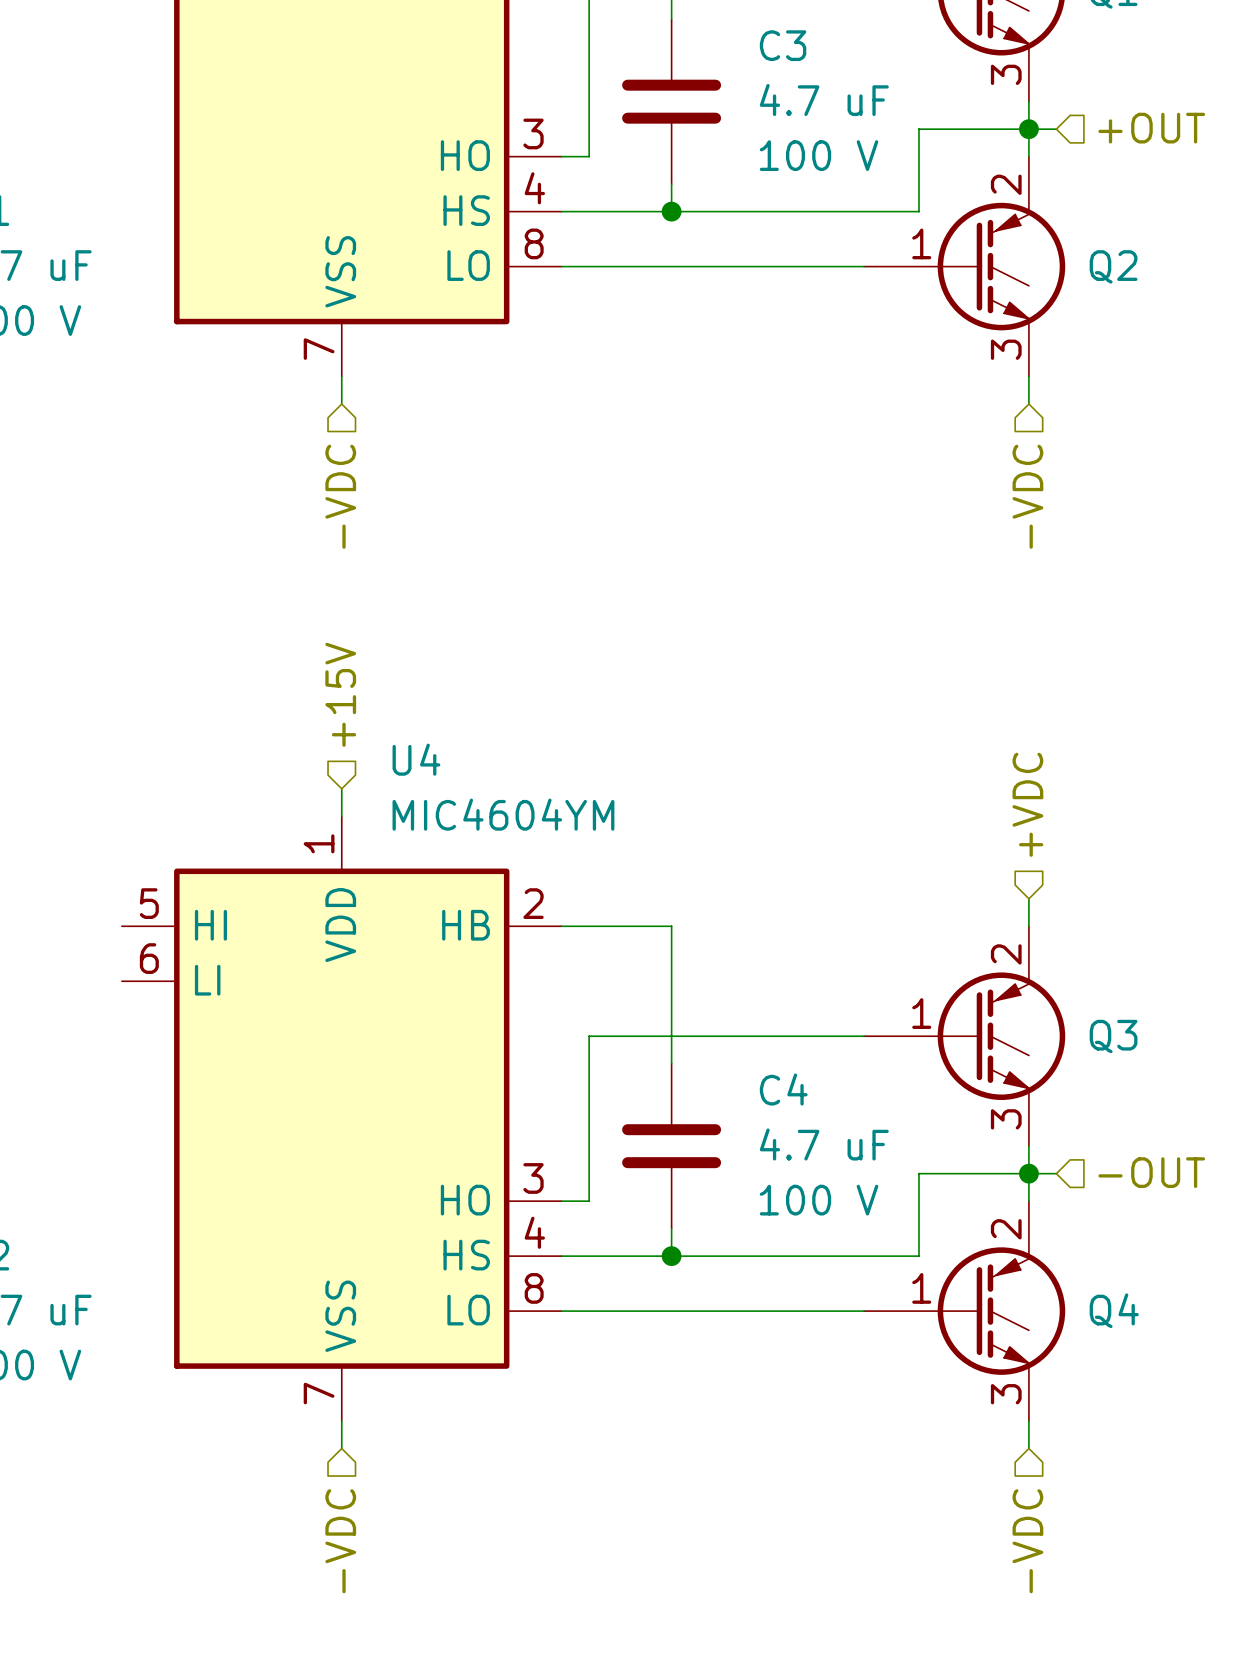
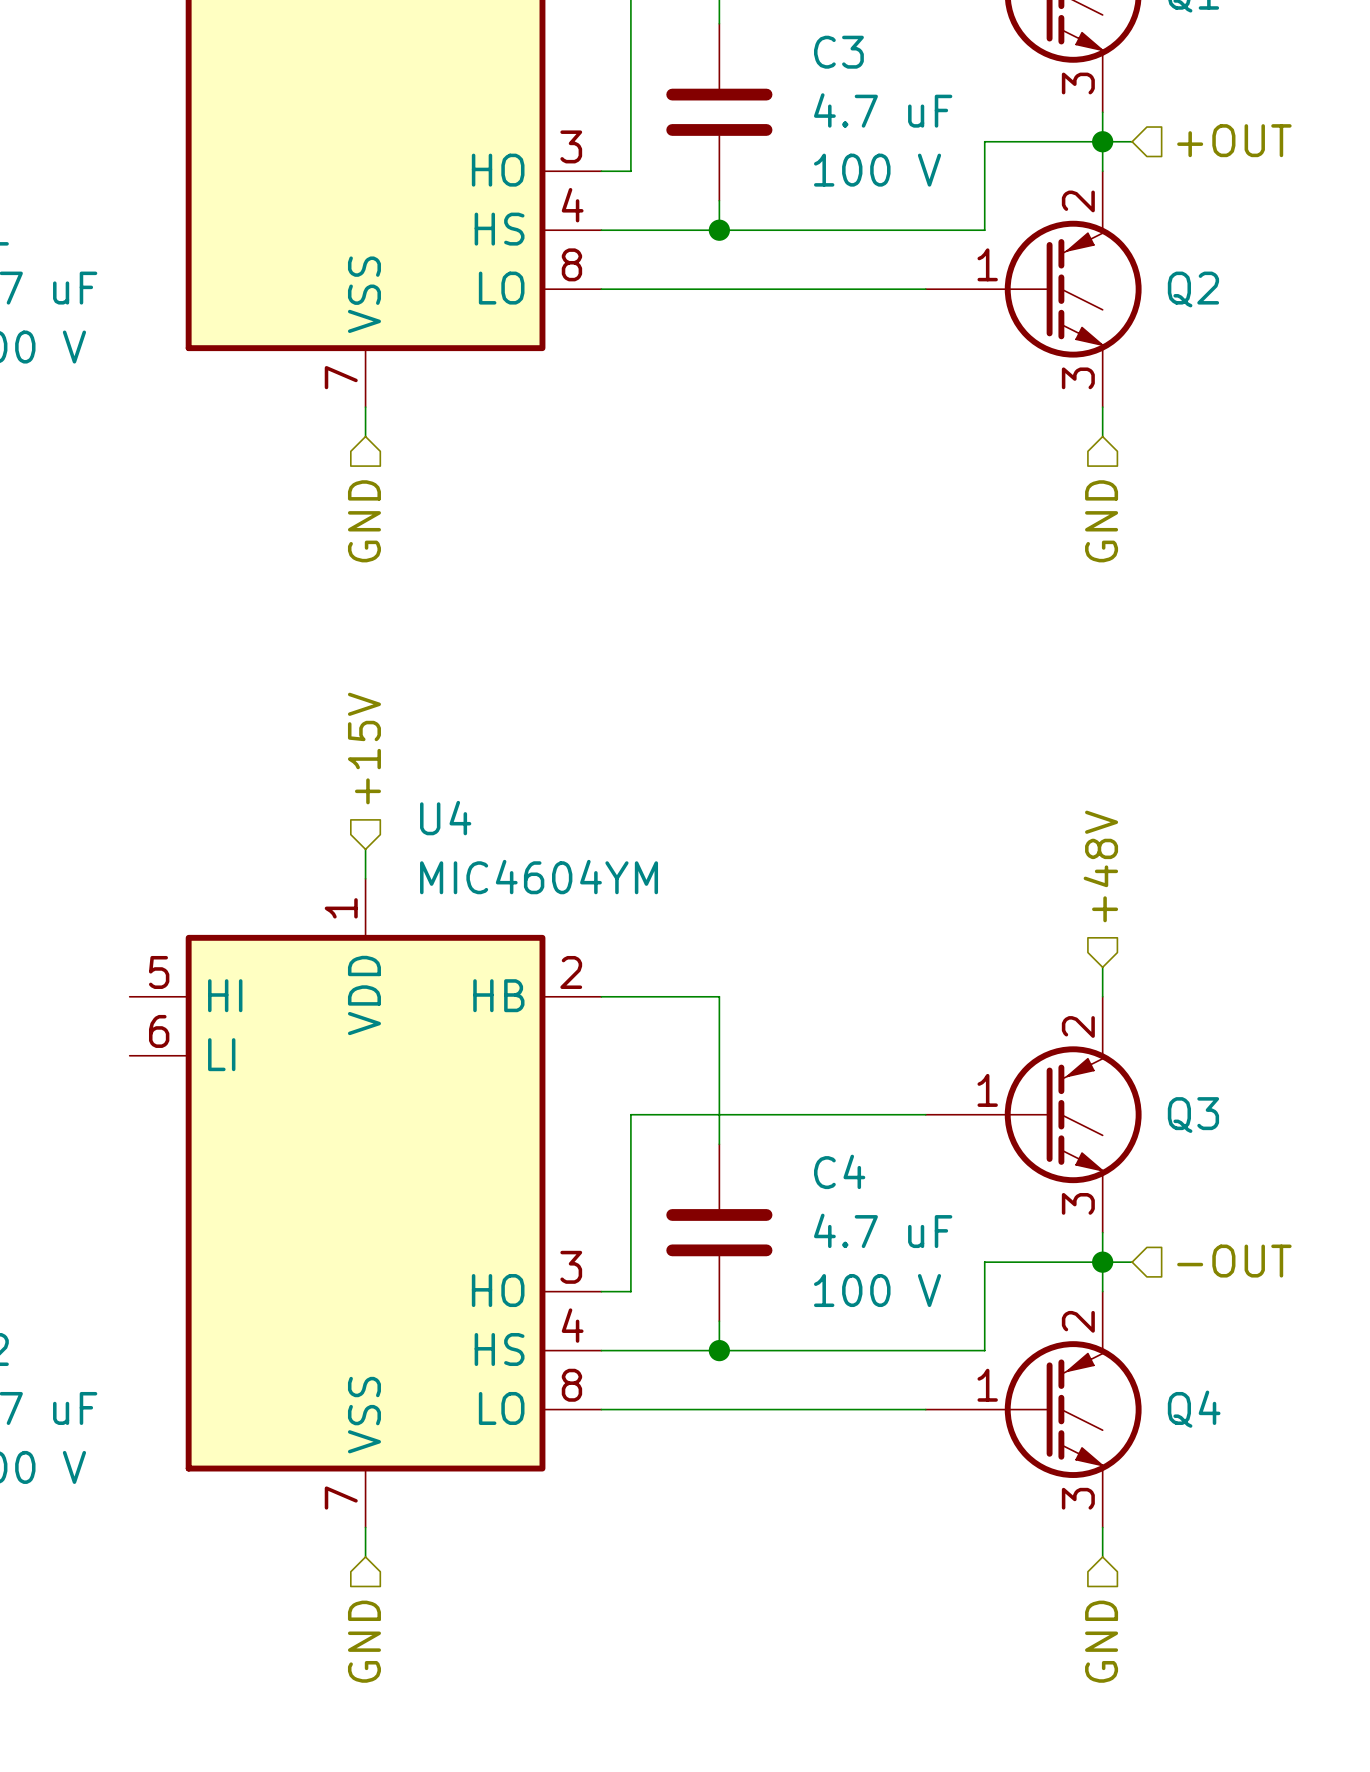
hierarchical label: -VDC (340, 496) -> GND (364, 521)
hierarchical label: -VDC (1027, 496) -> GND (1101, 521)
hierarchical label: +VDC (1027, 804) -> +48V (1100, 866)
hierarchical label: -VDC (340, 1541) -> GND (364, 1641)
hierarchical label: -VDC (1027, 1541) -> GND (1101, 1641)

